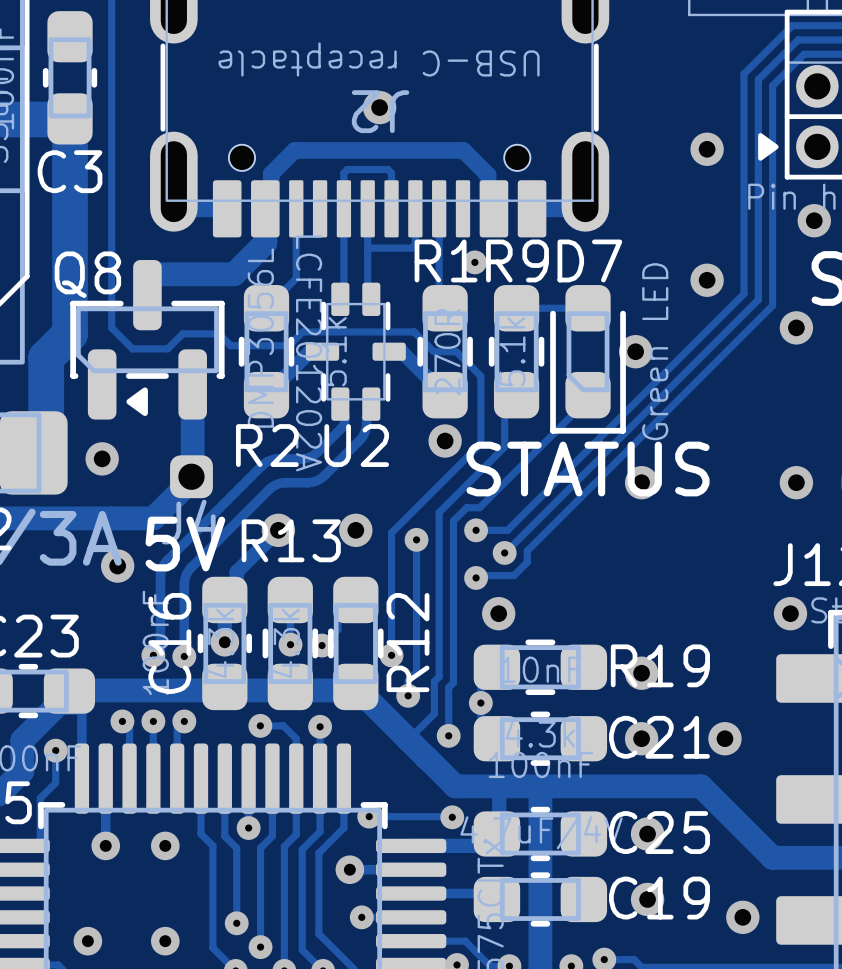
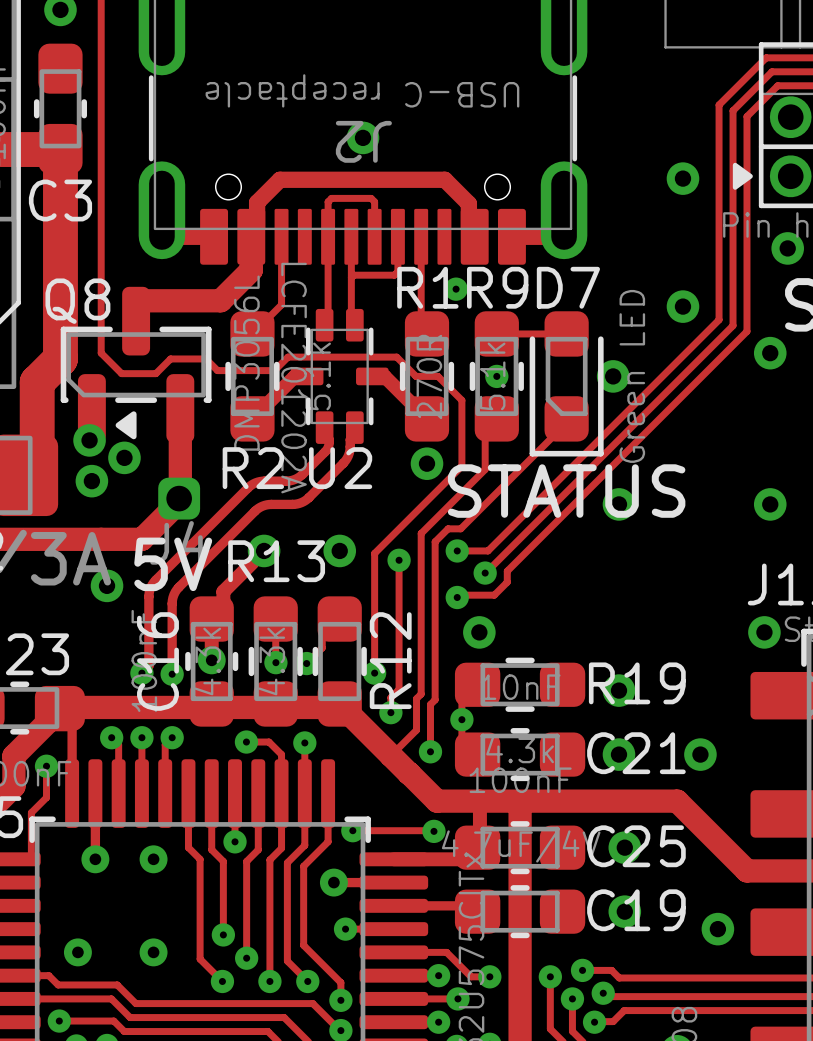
via: none -> (496, 376)
via: none -> (89, 440)
via: none -> (124, 457)

